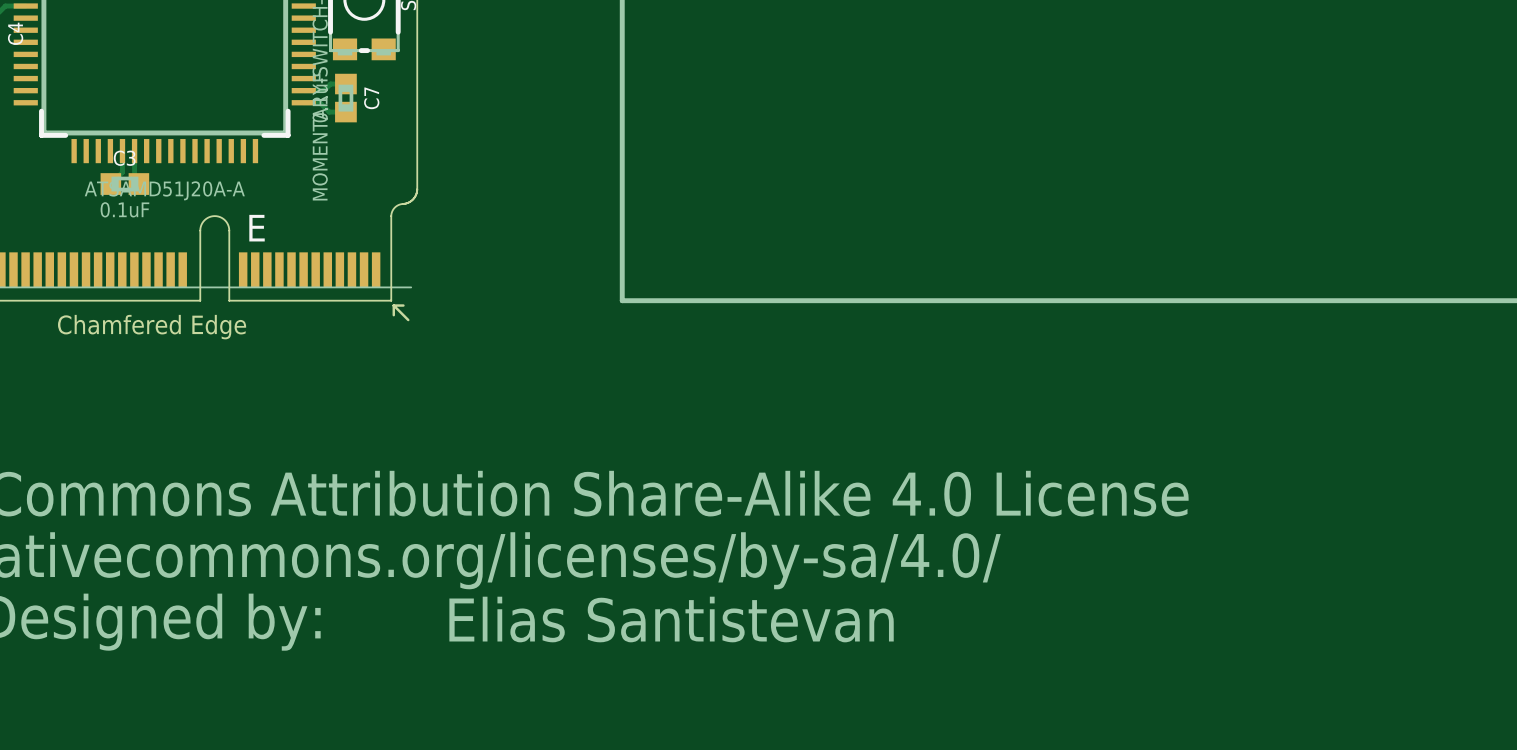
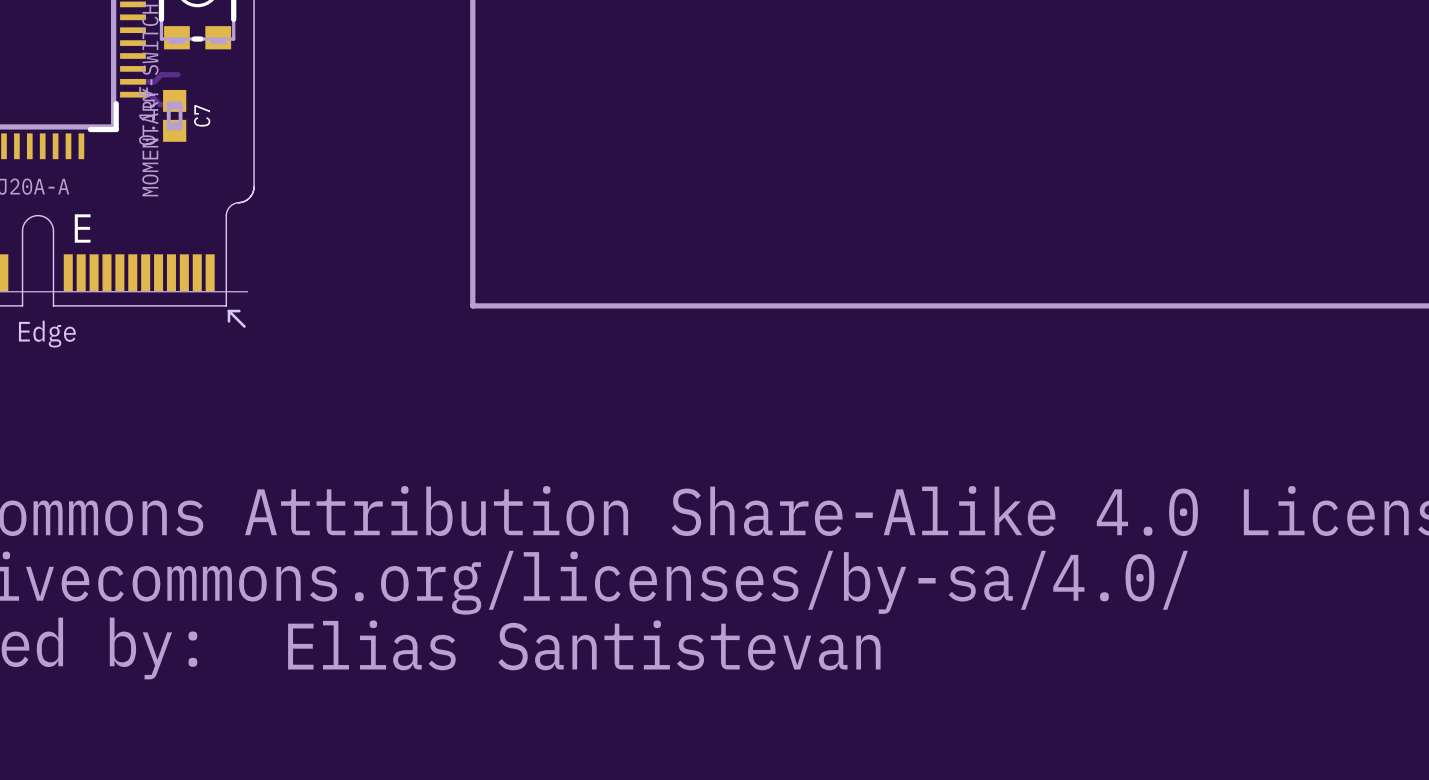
C7 position: (345, 98) -> (174, 115)

